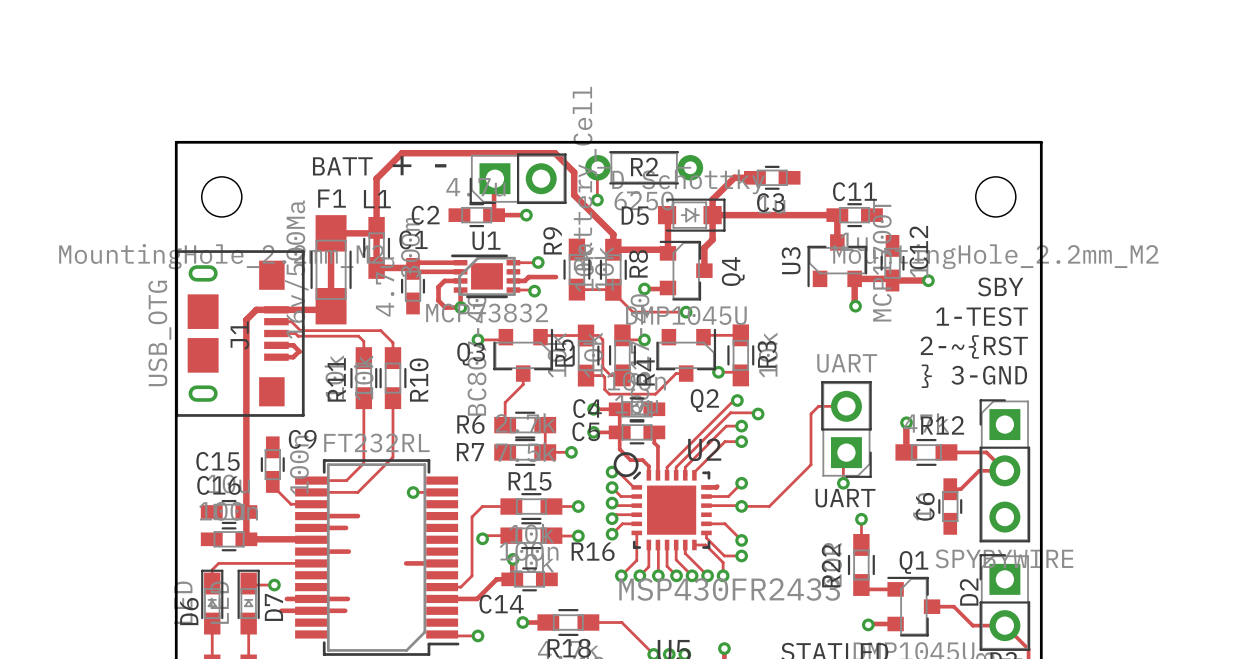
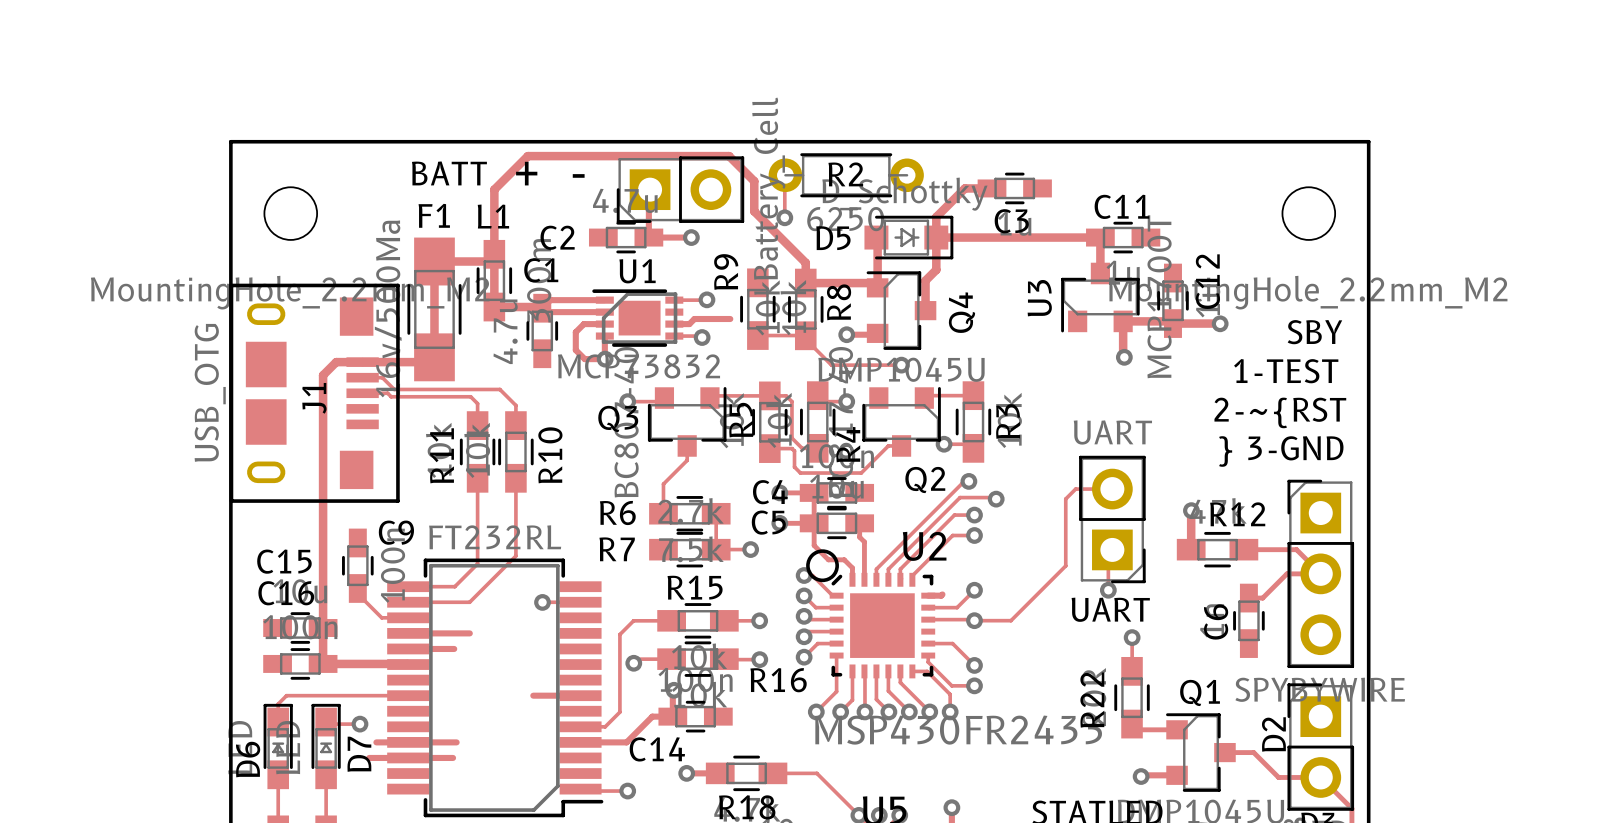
track: (276, 345) (293, 345) (299, 351) -> none
track: (298, 351) (293, 357) (276, 357) -> none
track: (311, 551) (348, 551) -> none

